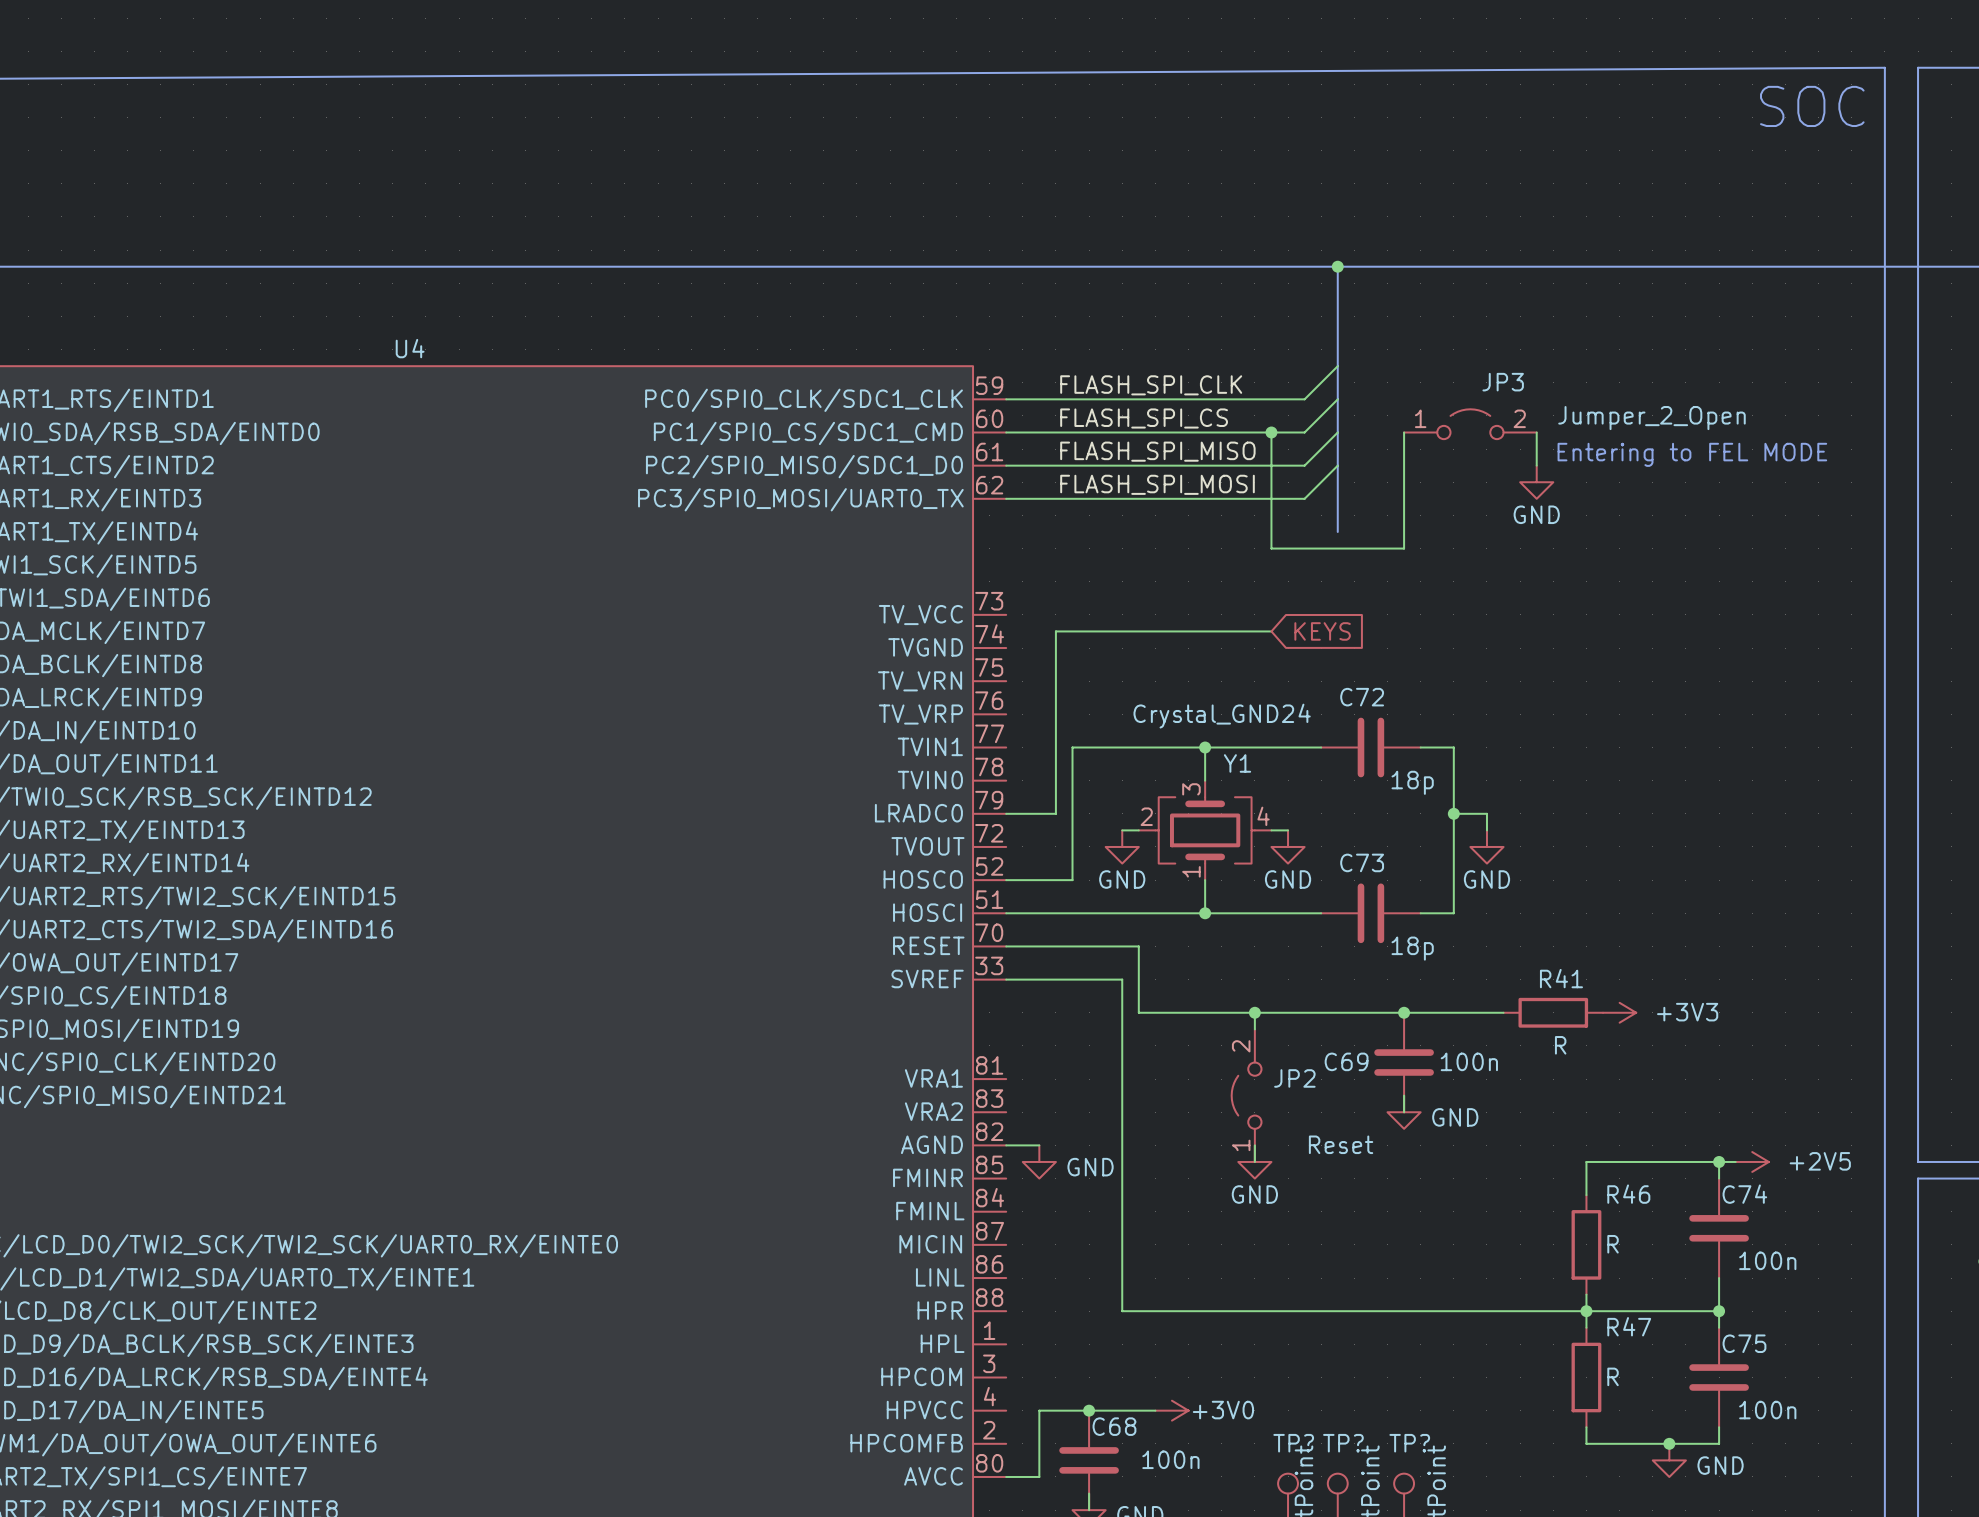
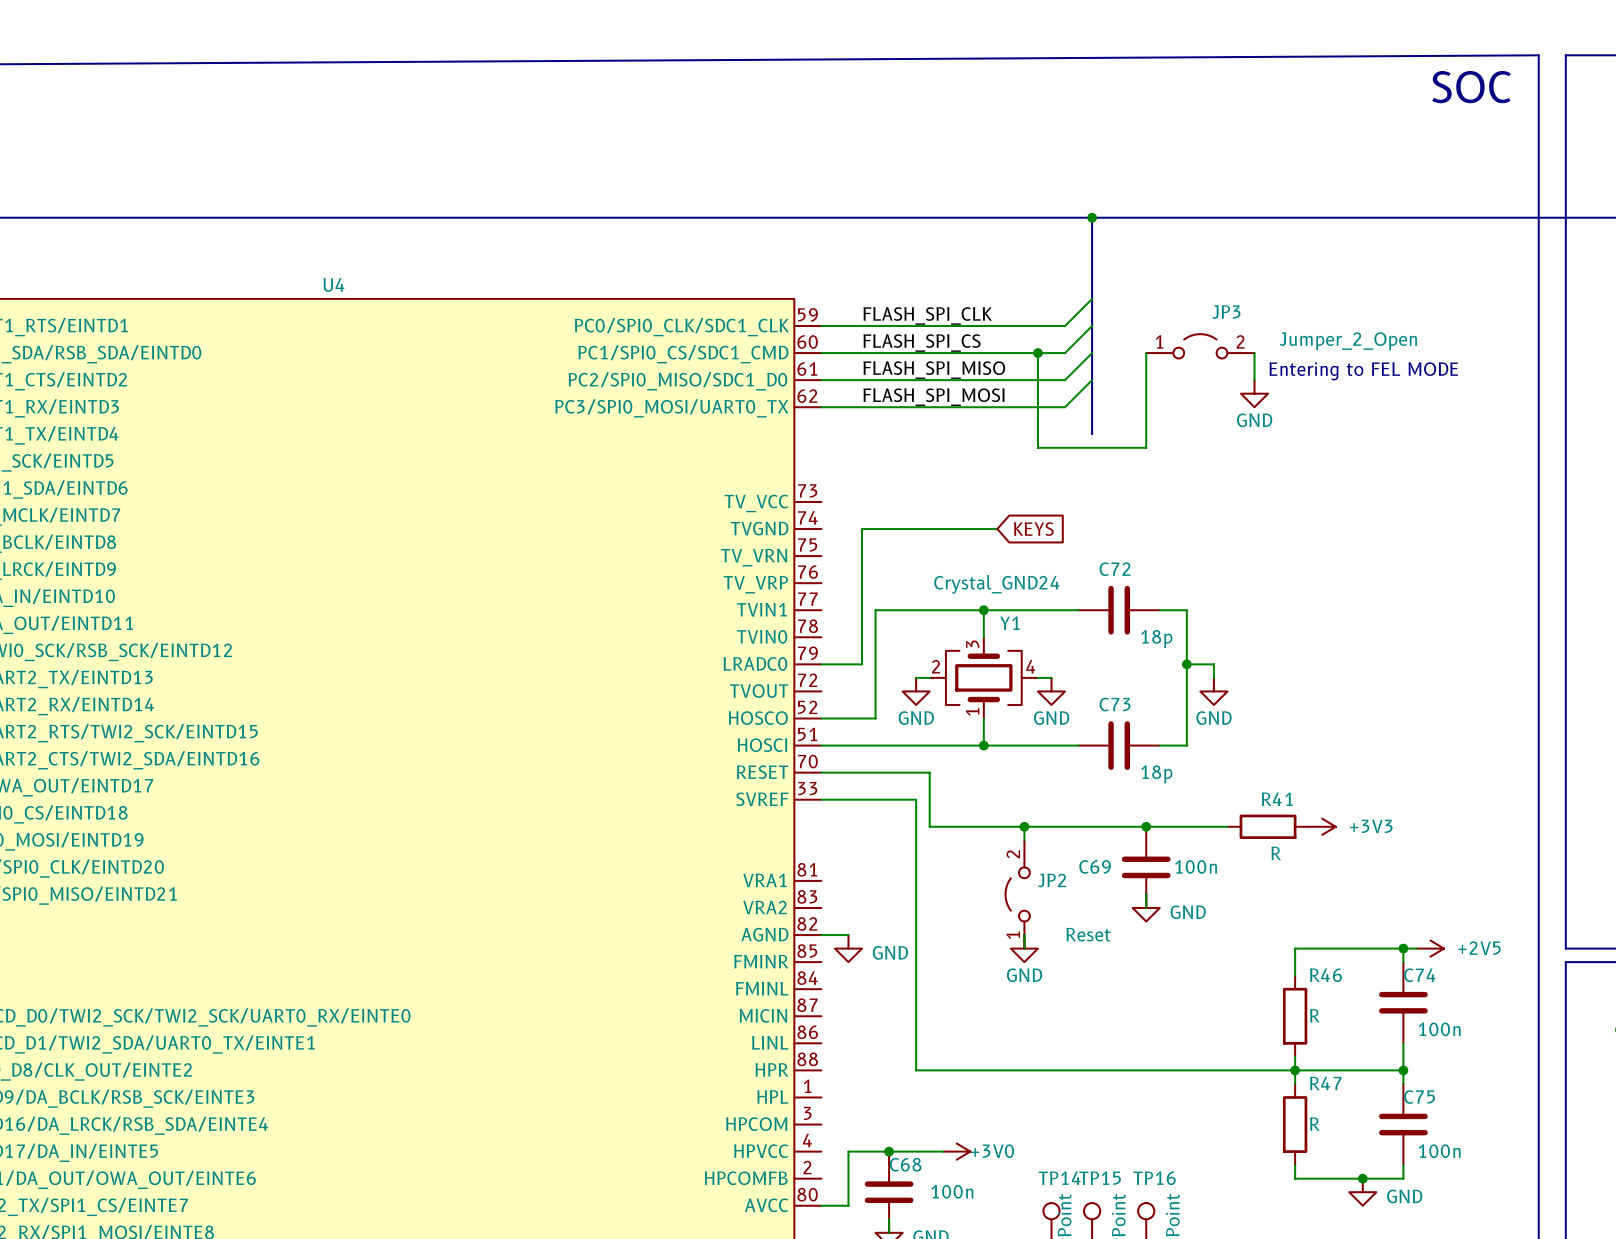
wire: (1271, 631) (1055, 631) (1055, 648) -> (997, 529) (862, 529)
global label position: KEYS (1322, 631) -> KEYS (1033, 529)
TP? name: TP? (1293, 1443) -> TP14 (1059, 1178)
TP? name: TP? (1343, 1443) -> TP15 (1100, 1178)
TP? name: TP? (1409, 1443) -> TP16 (1154, 1178)

